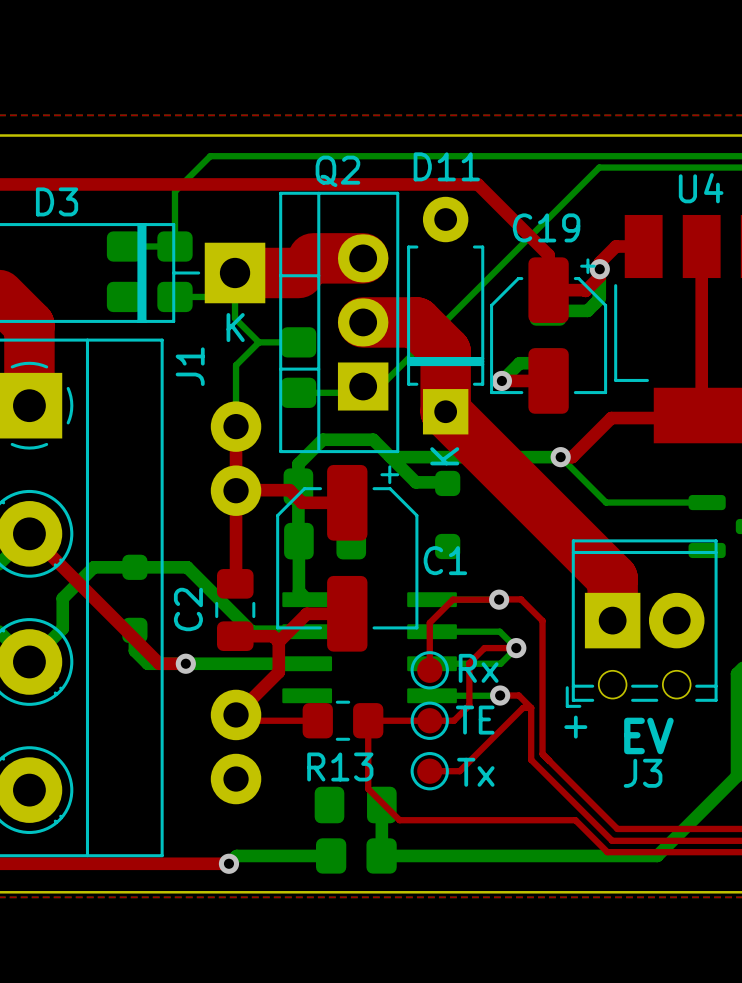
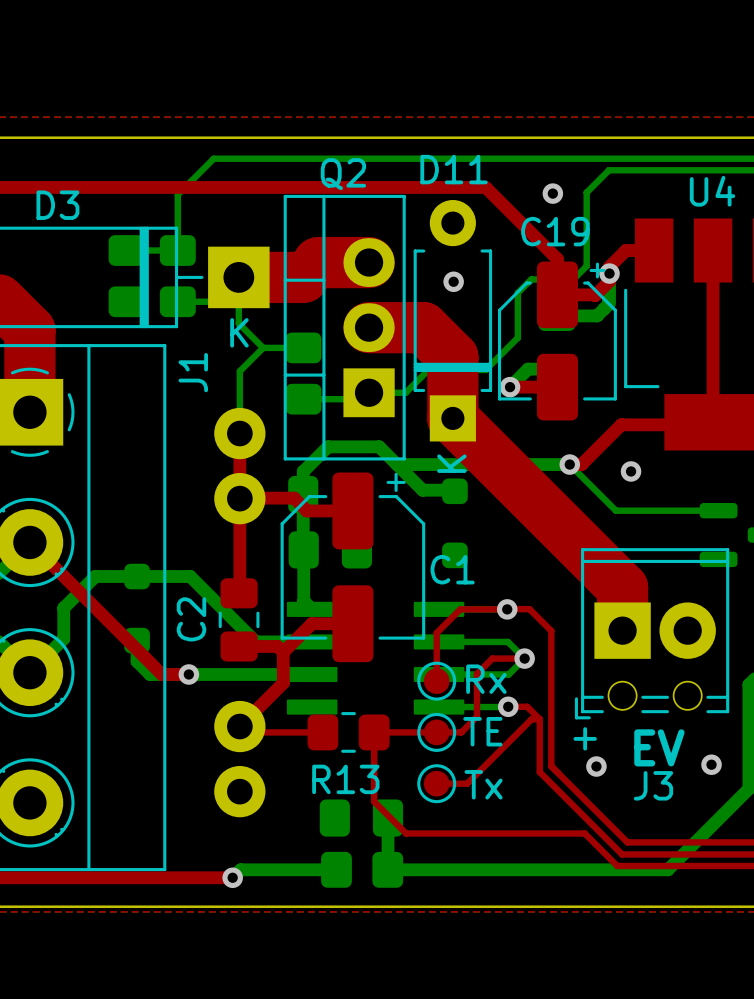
bottom track: (577, 189) (380, 386) -> (517, 292) (517, 337) (485, 369) (428, 369) (405, 392) (386, 392)
bottom track: none -> (586, 192) (586, 266) (573, 279) (531, 279) (517, 292)
via: none -> (552, 193)
via: none -> (453, 281)
via: none -> (631, 471)
via: none -> (711, 764)
via: none -> (596, 766)

